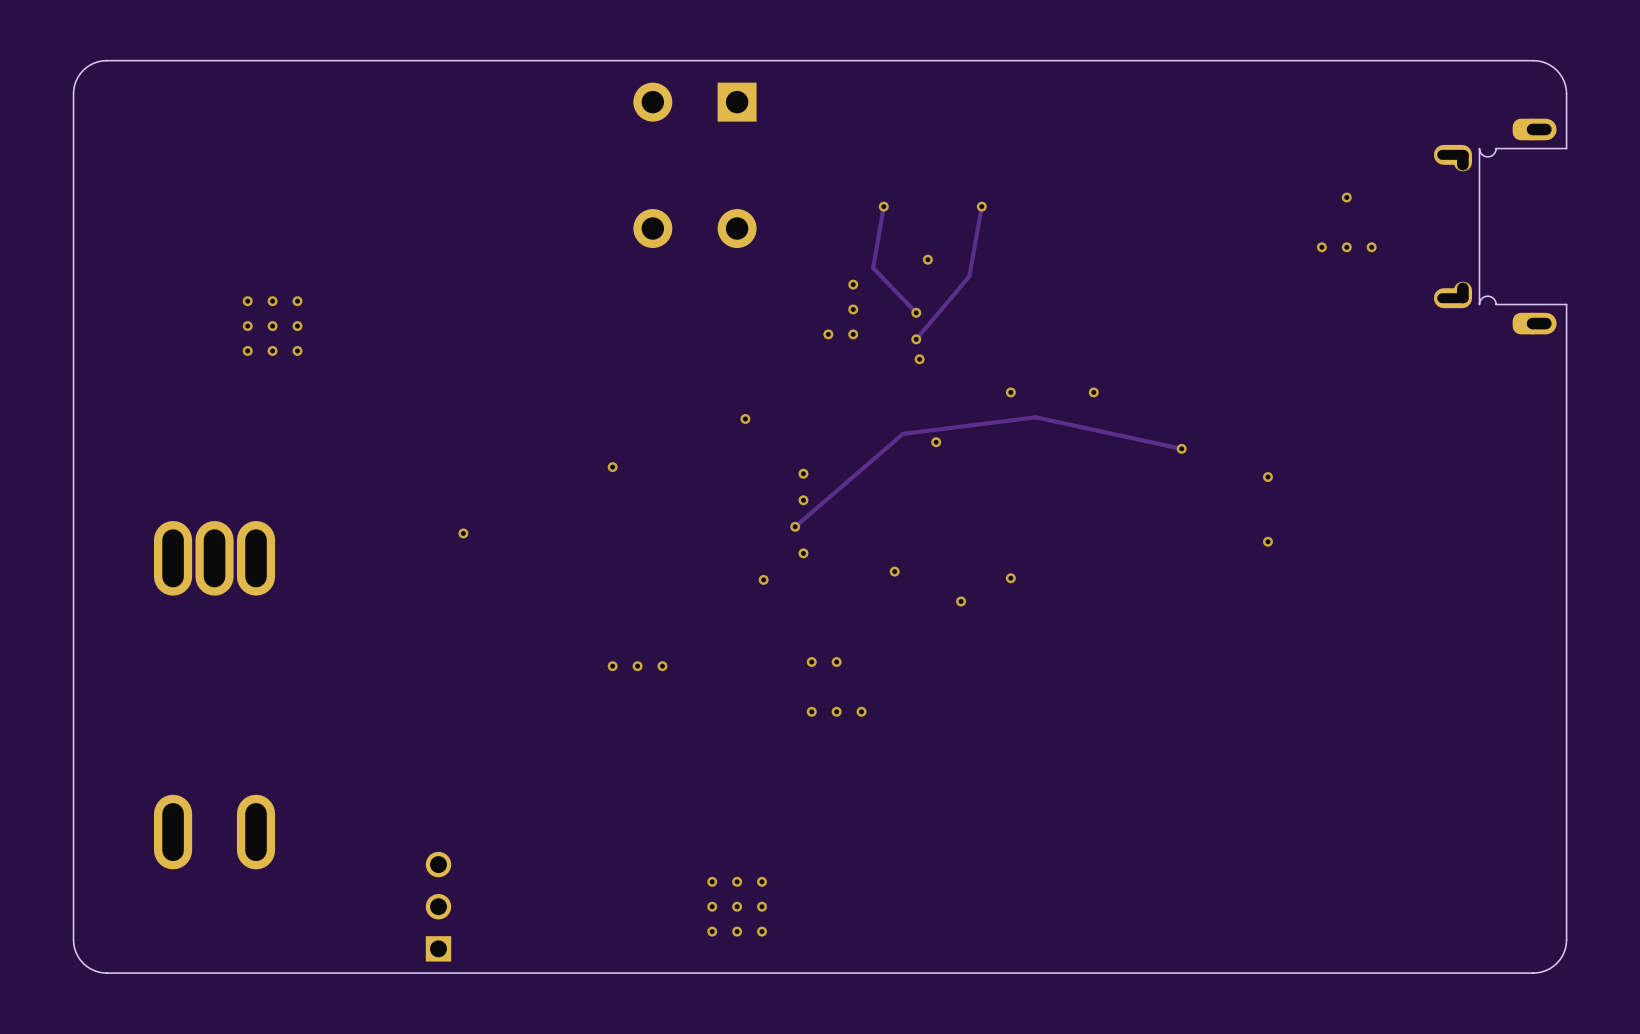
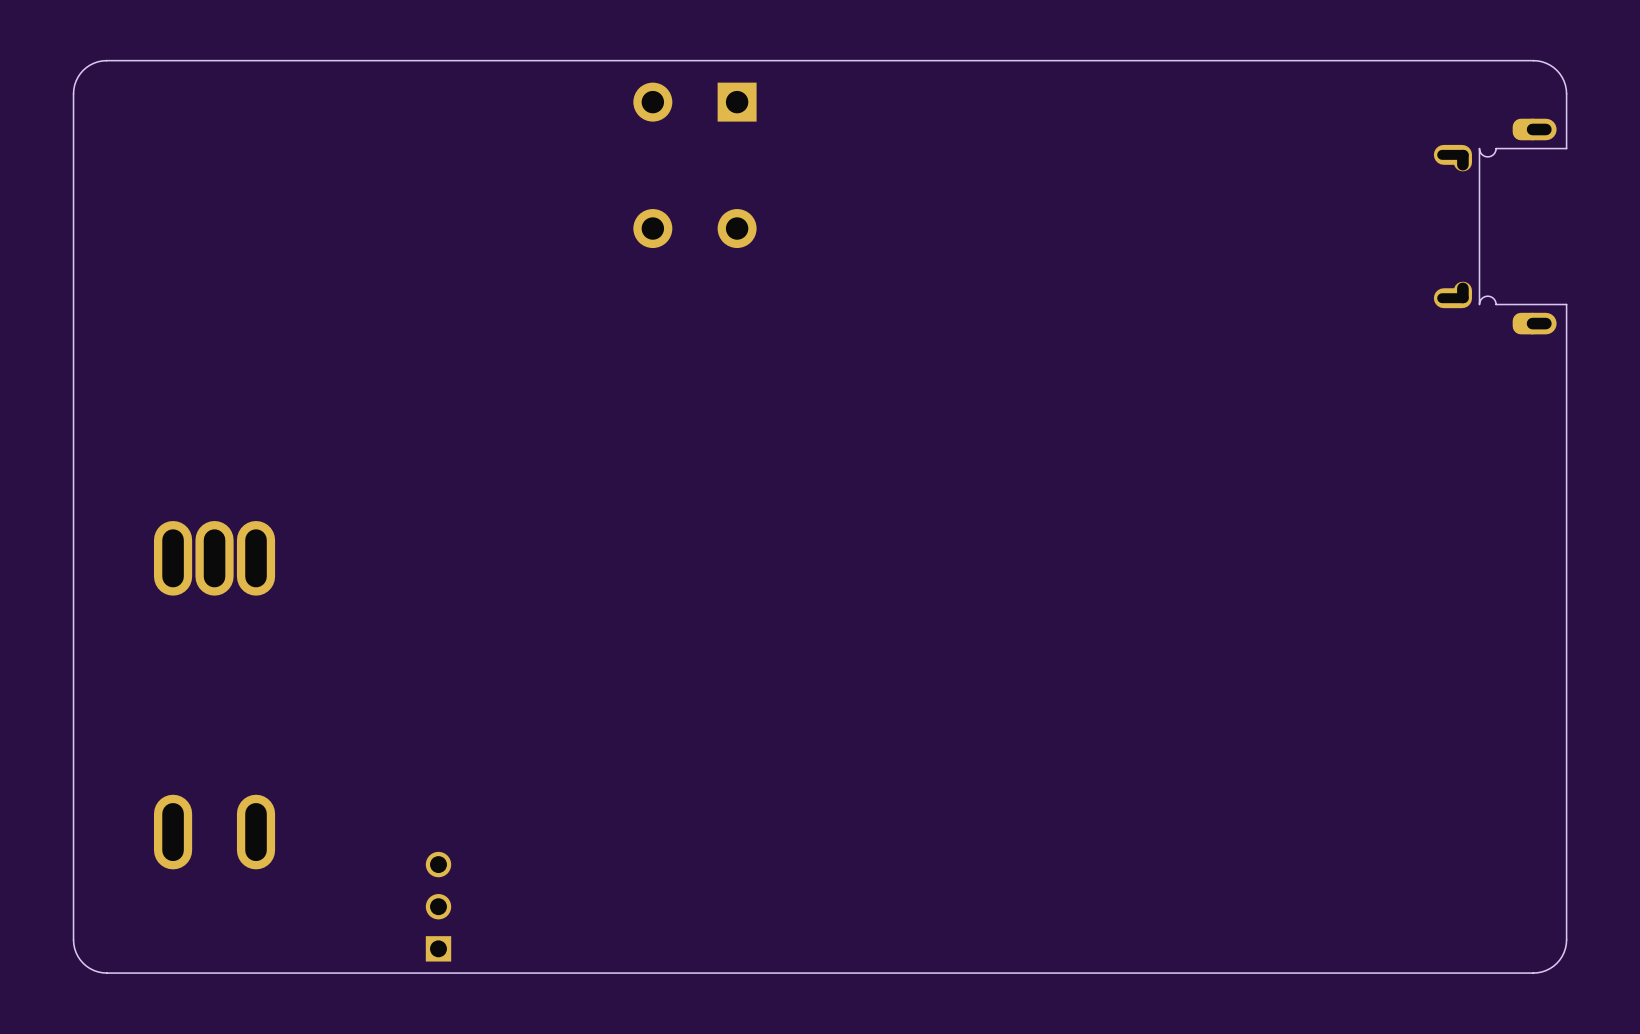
via: (1346, 197) -> none
track: (883, 206) (873, 268) (916, 312) -> none
via: (883, 206) -> none
track: (981, 206) (969, 276) (916, 339) -> none
via: (981, 206) -> none
via: (1321, 247) -> none
via: (1346, 247) -> none
via: (1371, 247) -> none
via: (927, 259) -> none
via: (853, 284) -> none
via: (247, 301) -> none
via: (272, 301) -> none
via: (297, 301) -> none
via: (853, 309) -> none
via: (916, 312) -> none
via: (247, 326) -> none
via: (272, 326) -> none
via: (297, 326) -> none
via: (828, 334) -> none
via: (853, 334) -> none
via: (916, 339) -> none
via: (247, 350) -> none
via: (272, 350) -> none
via: (297, 350) -> none
via: (919, 359) -> none
via: (1010, 392) -> none
via: (1093, 392) -> none
via: (745, 418) -> none
via: (936, 442) -> none
track: (1181, 448) (1035, 417) (903, 433) (795, 526) -> none
via: (1181, 448) -> none
via: (612, 467) -> none
via: (803, 473) -> none
via: (1267, 477) -> none
via: (803, 500) -> none
via: (795, 526) -> none
via: (463, 533) -> none
via: (1267, 541) -> none
via: (803, 553) -> none
via: (894, 571) -> none
via: (1010, 578) -> none
via: (763, 579) -> none
via: (961, 601) -> none
via: (811, 662) -> none
via: (836, 662) -> none
via: (612, 666) -> none
via: (637, 666) -> none
via: (662, 666) -> none
via: (811, 711) -> none
via: (836, 711) -> none
via: (861, 711) -> none
via: (712, 881) -> none
via: (737, 881) -> none
via: (761, 881) -> none
via: (712, 906) -> none
via: (737, 906) -> none
via: (761, 906) -> none
via: (712, 931) -> none
via: (737, 931) -> none
via: (761, 931) -> none

